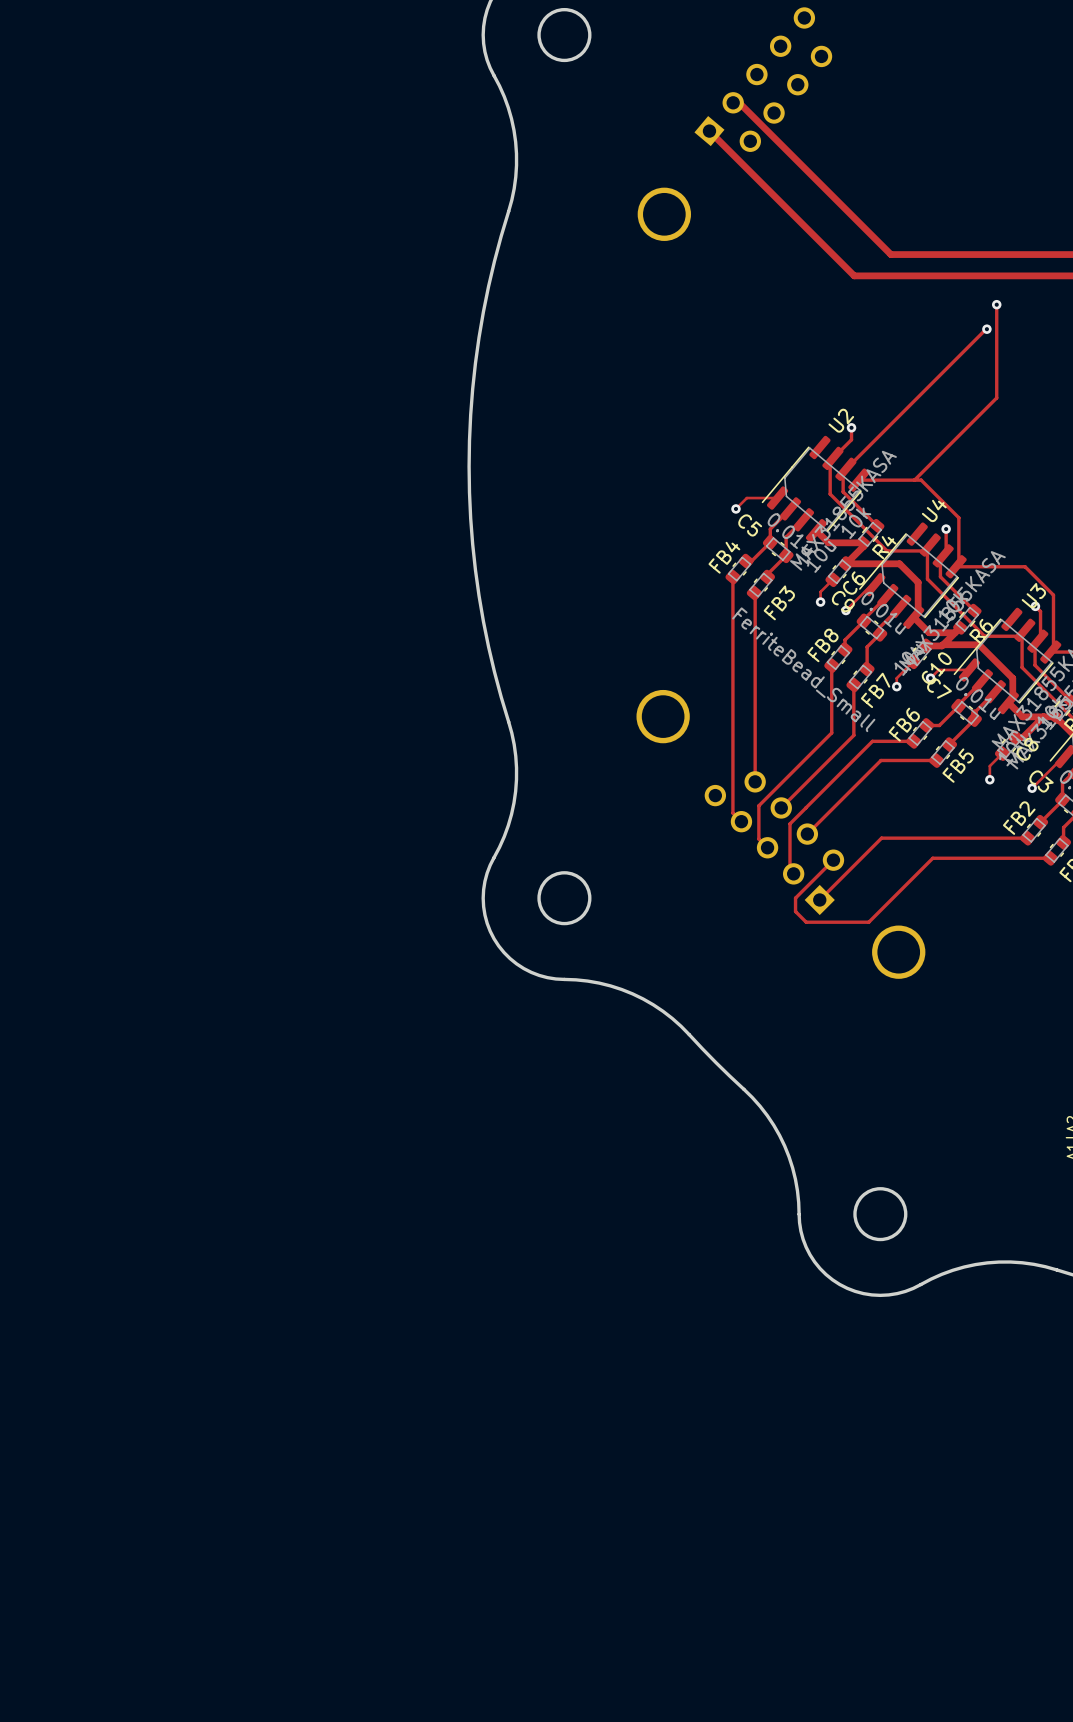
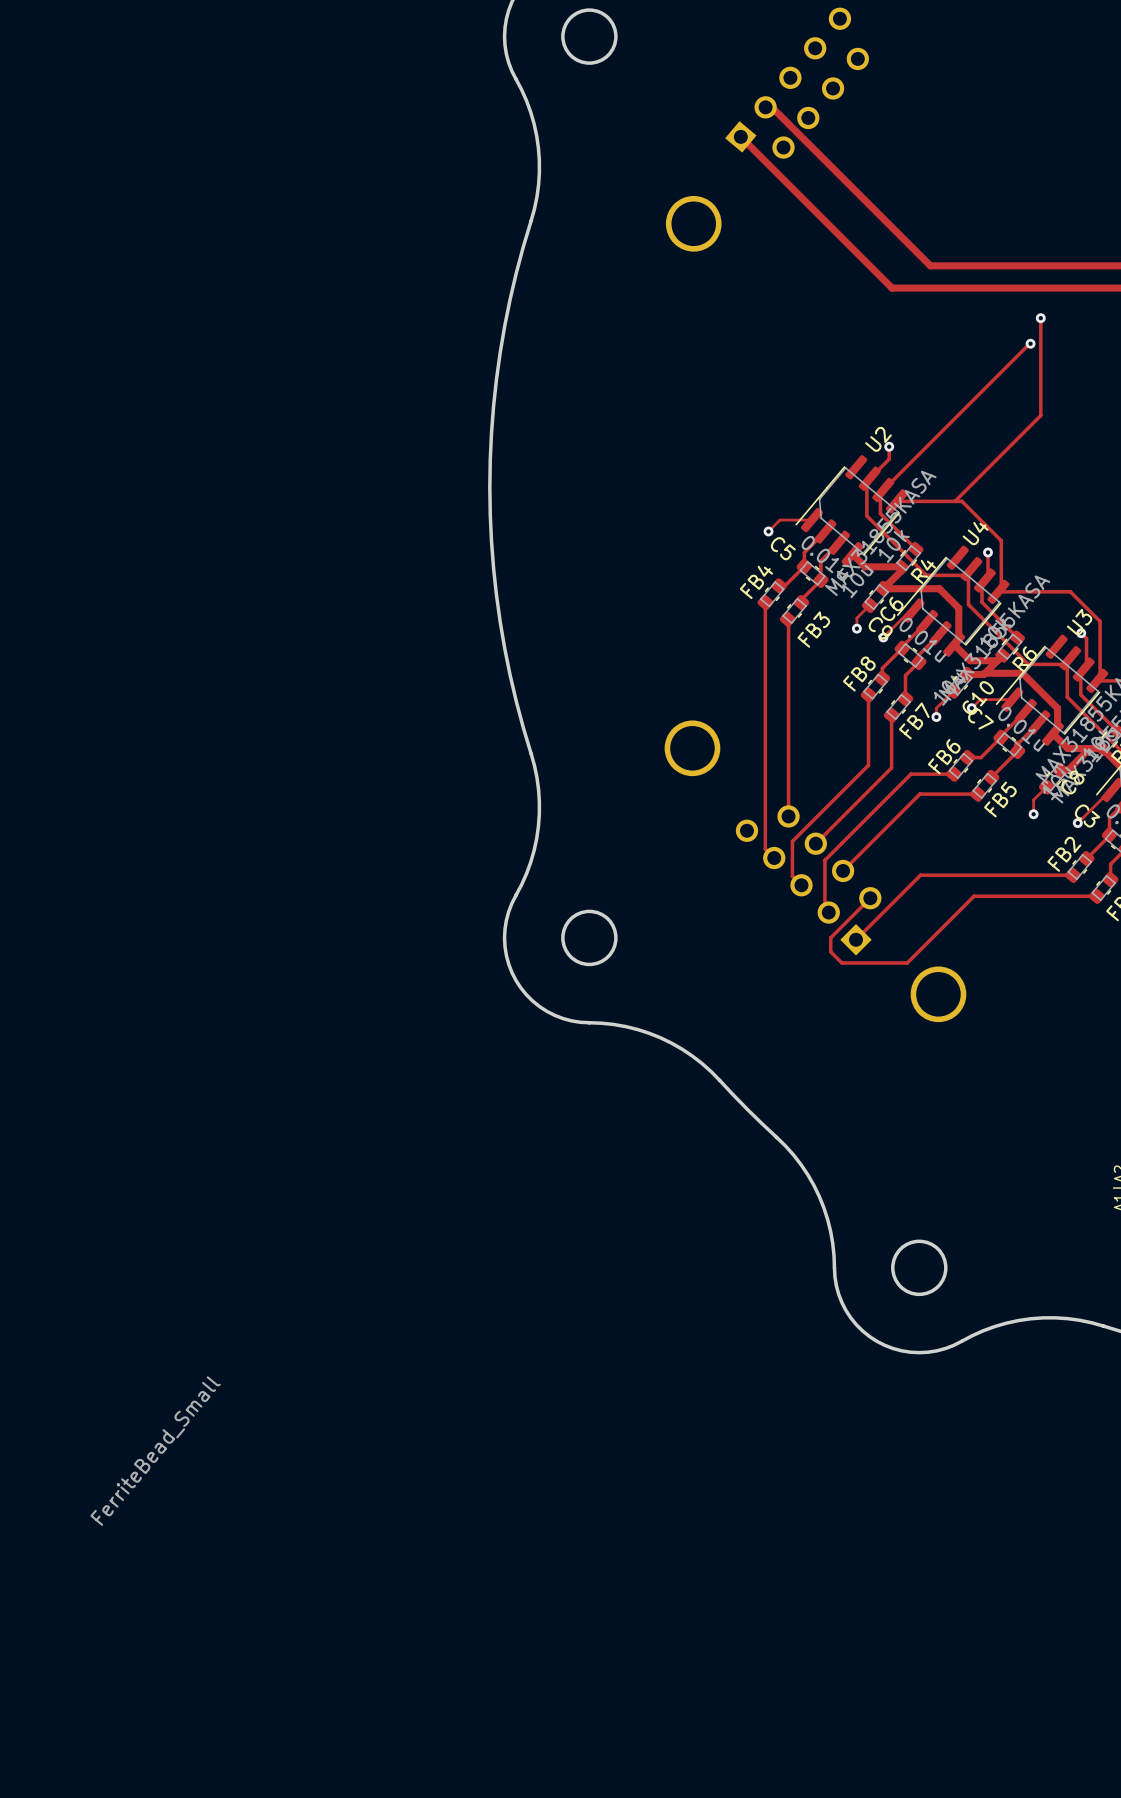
FB7 value rotation: 0° (803, 669) -> 90° counterclockwise (155, 1451)
FB7 value position: FerriteBead_Small (803, 669) -> FerriteBead_Small (155, 1451)

